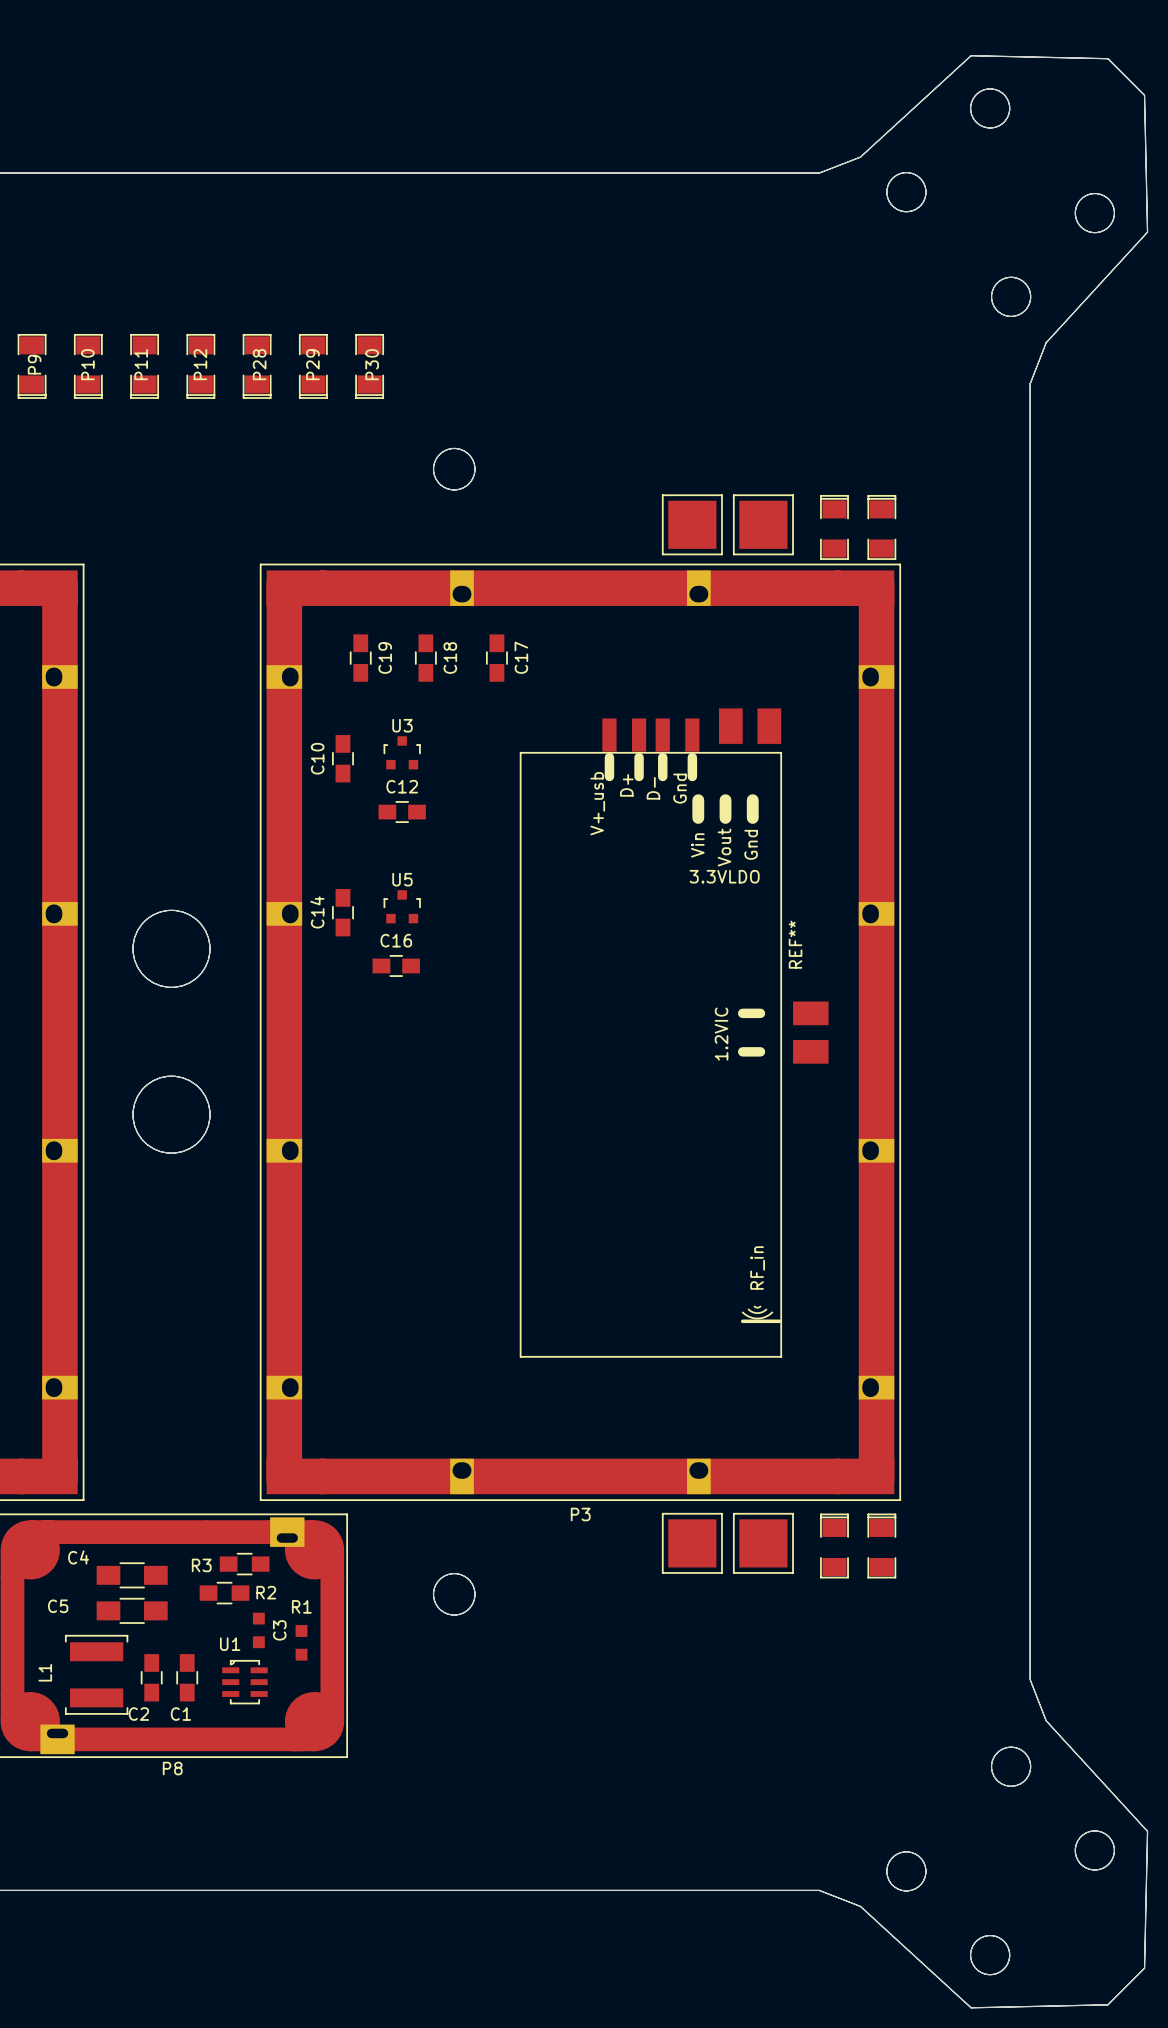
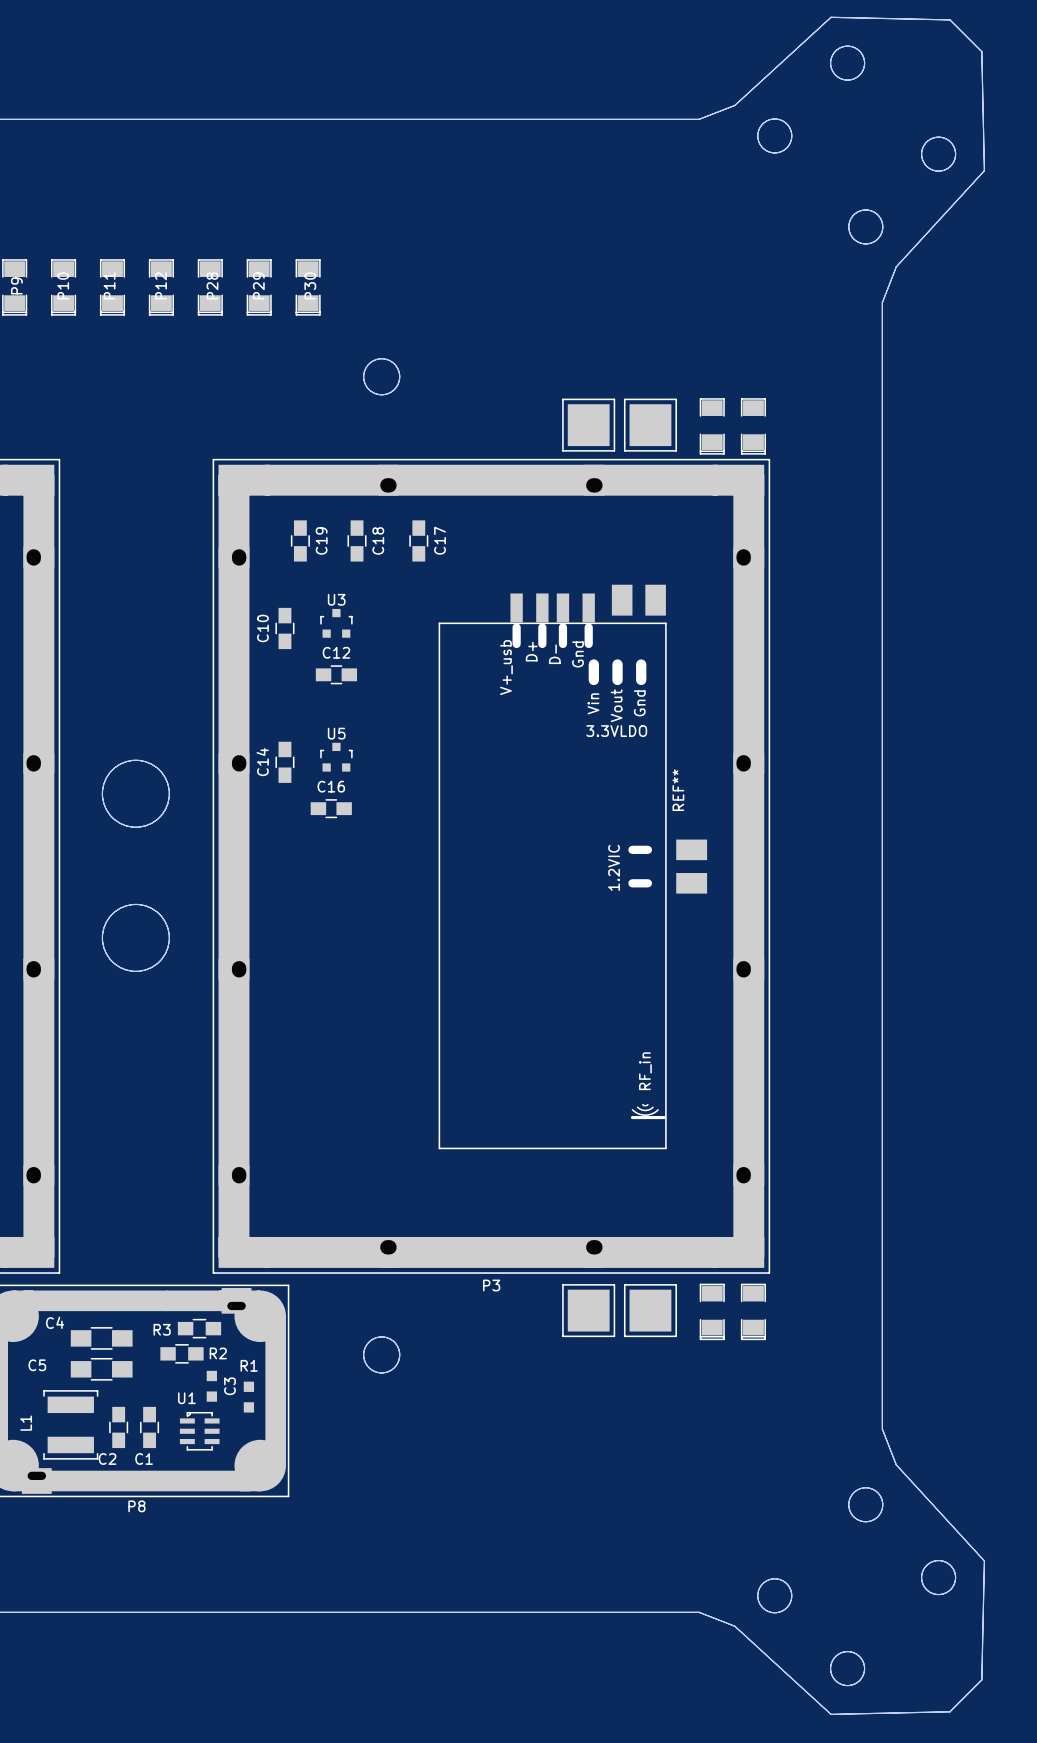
part rotation: 0° (834, 527) -> 180° (712, 426)
part rotation: 0° (881, 527) -> 180° (753, 426)
part rotation: 0° (834, 1545) -> 180° (712, 1311)
part rotation: 0° (881, 1545) -> 180° (753, 1311)

